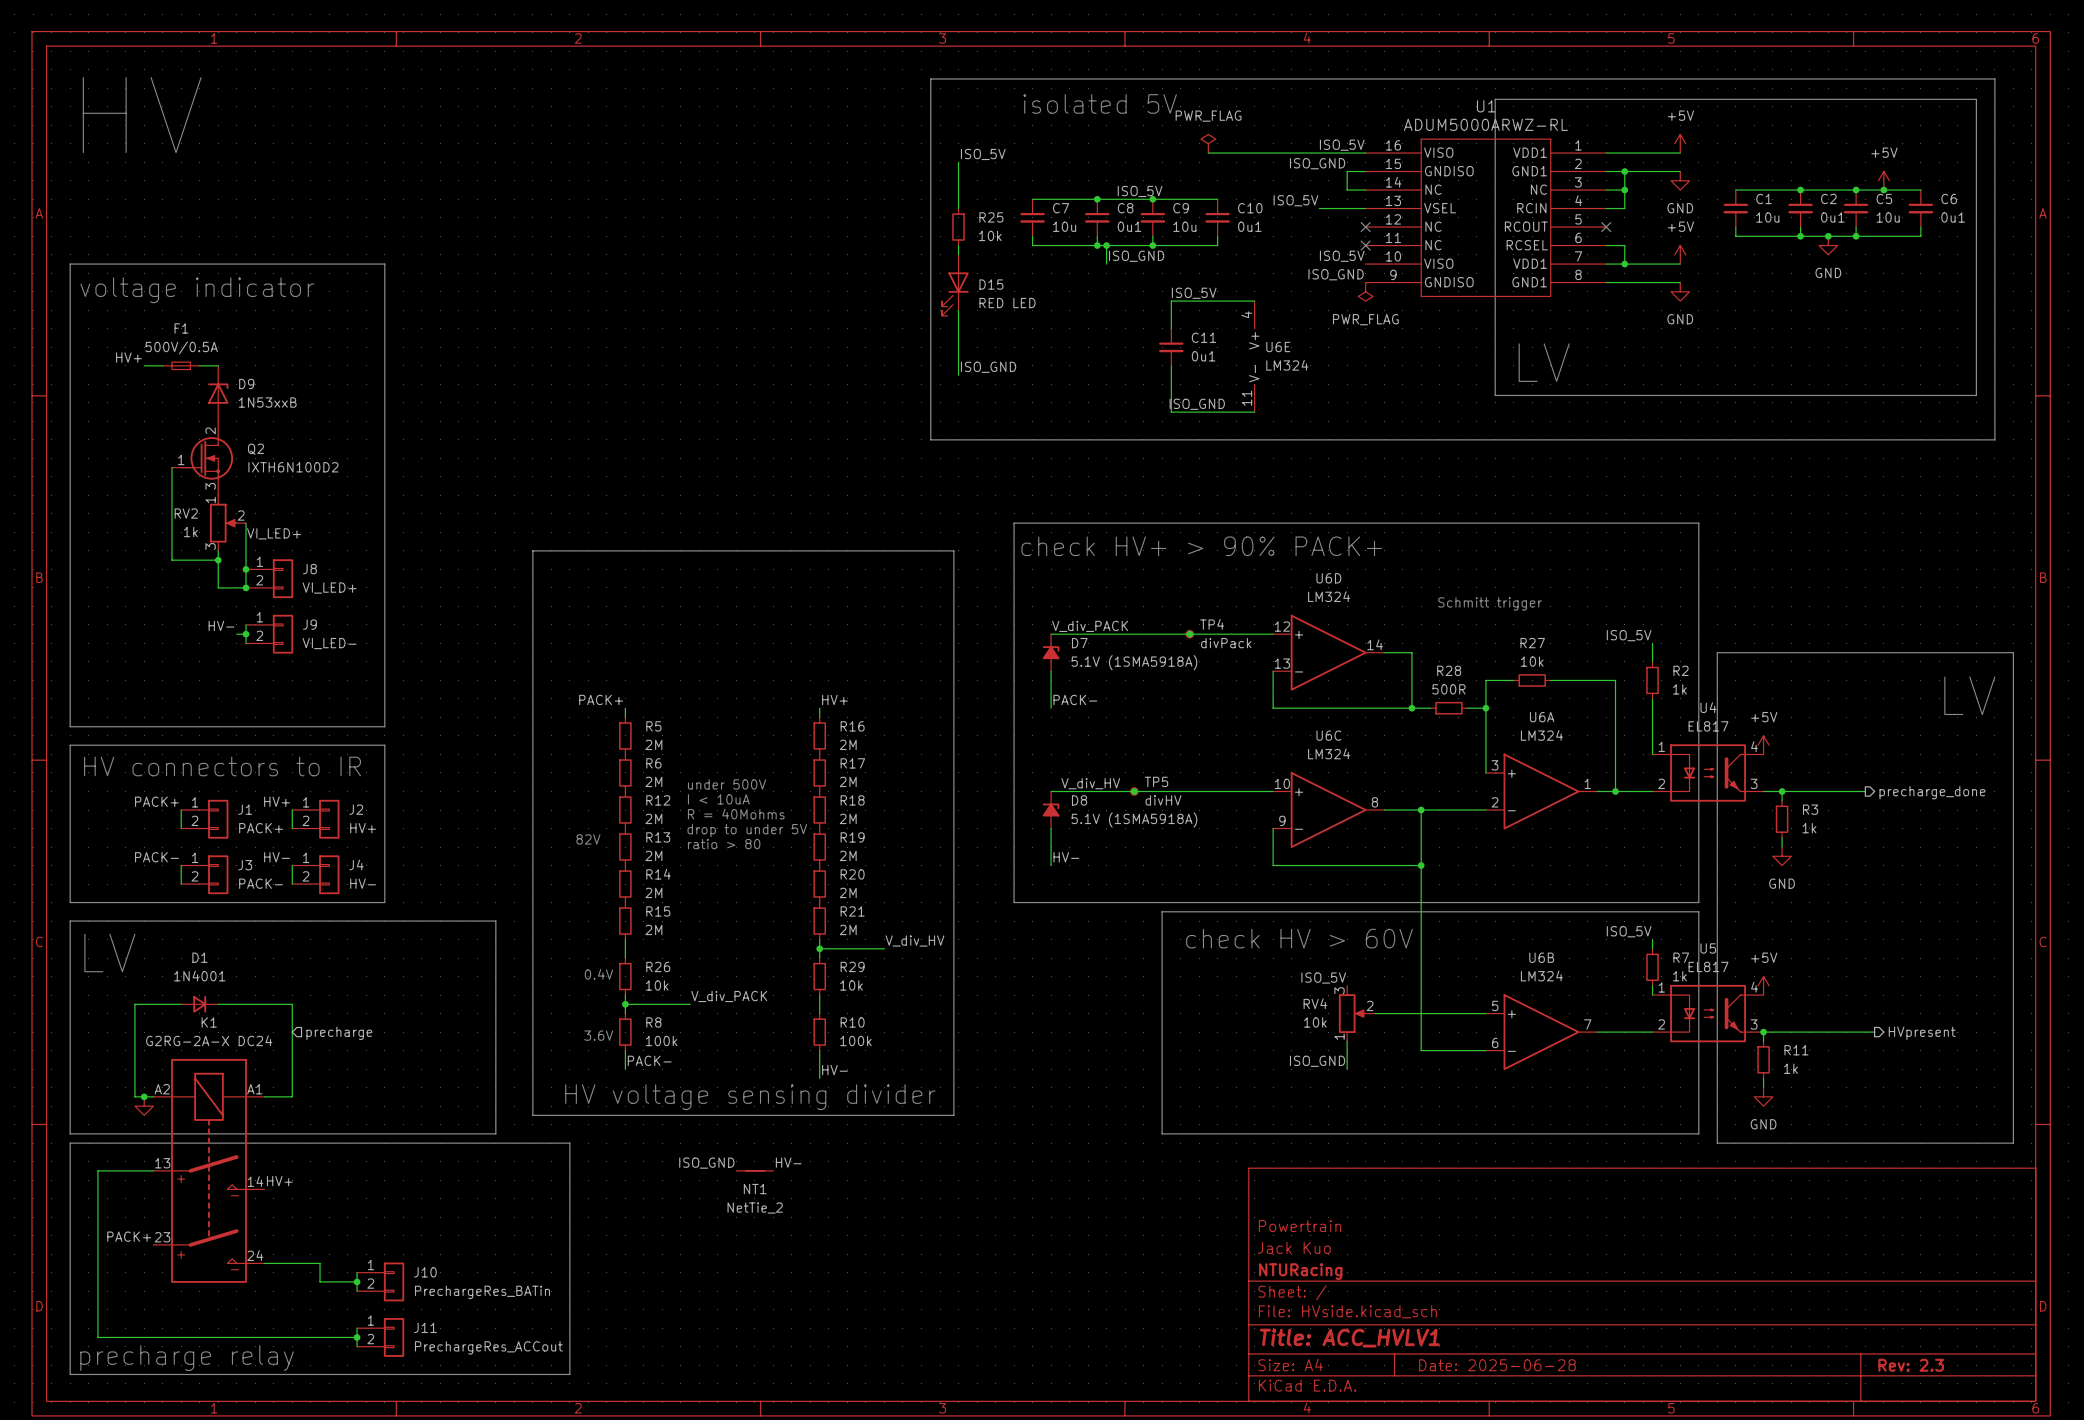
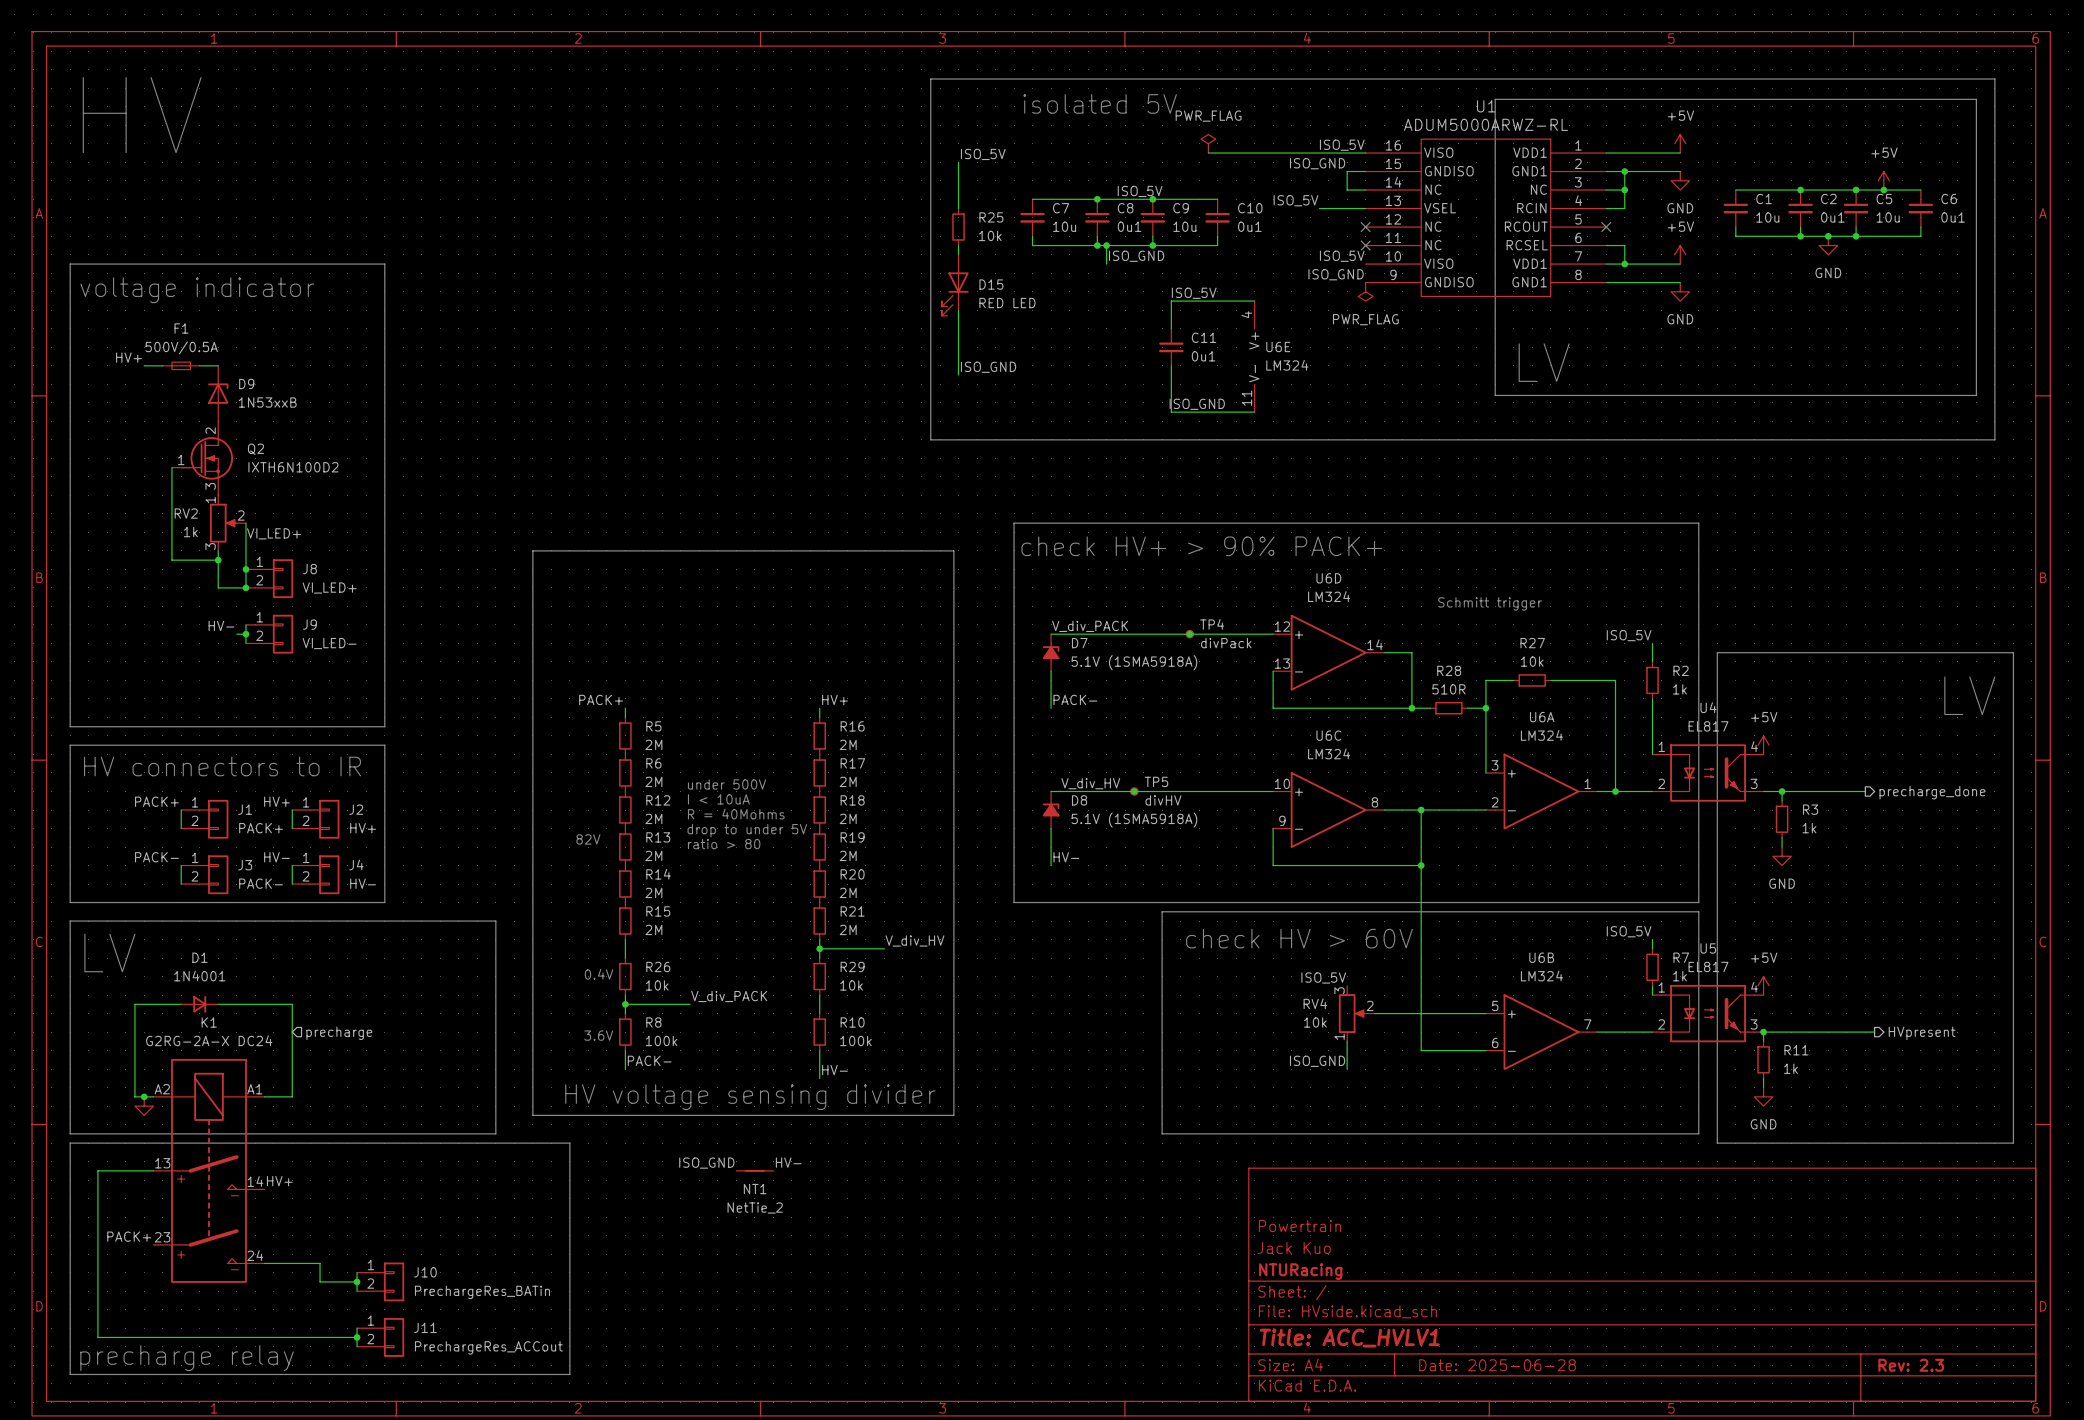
R28 value: 500R (1448, 689) -> 510R (1448, 689)

